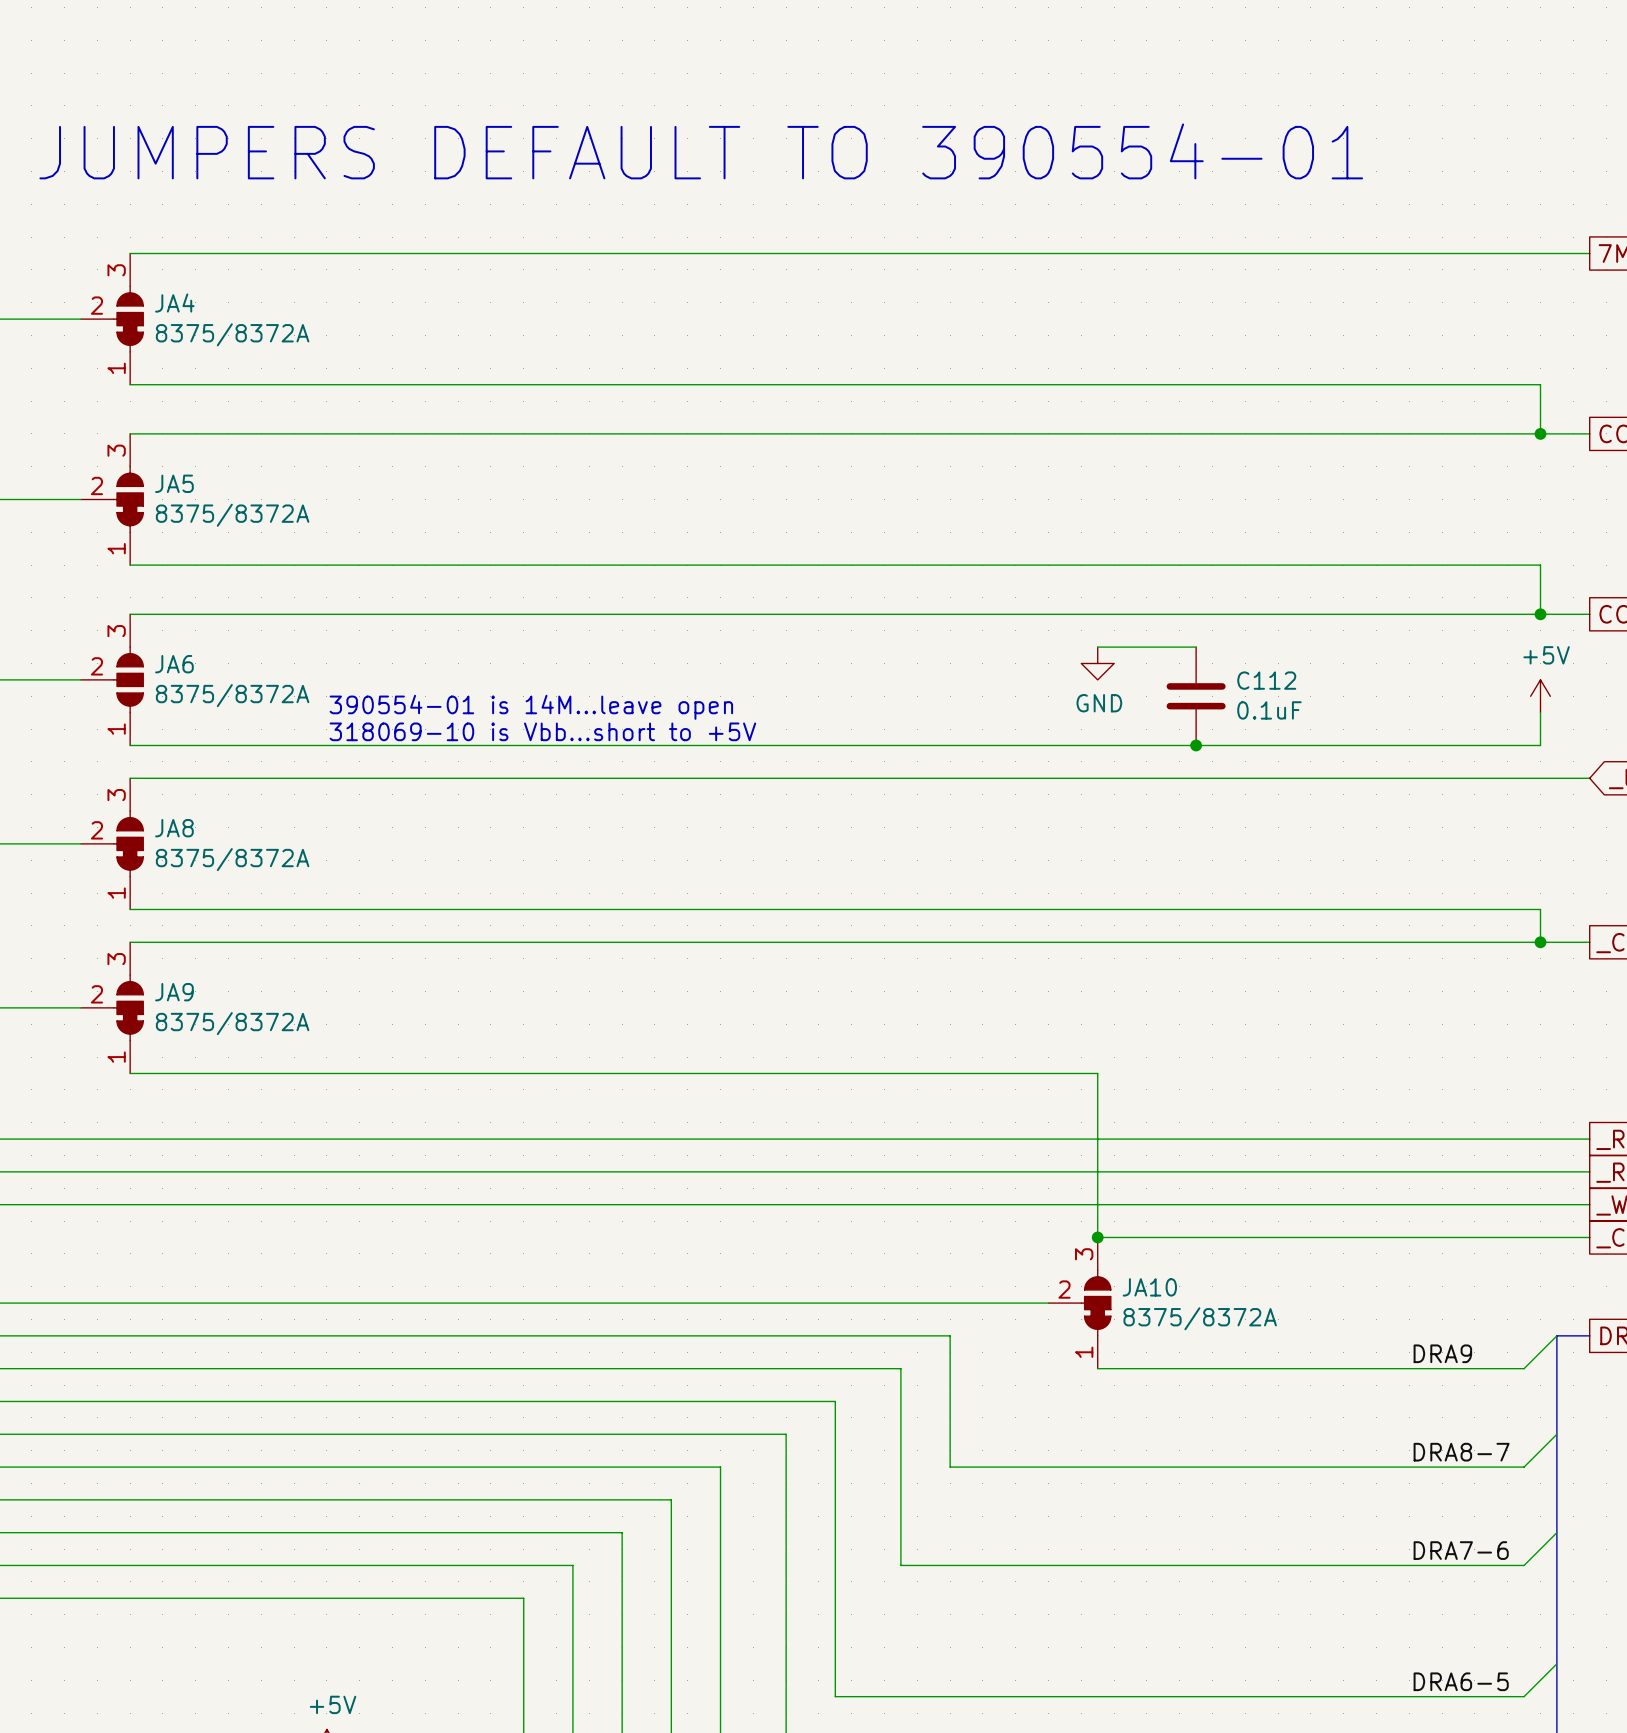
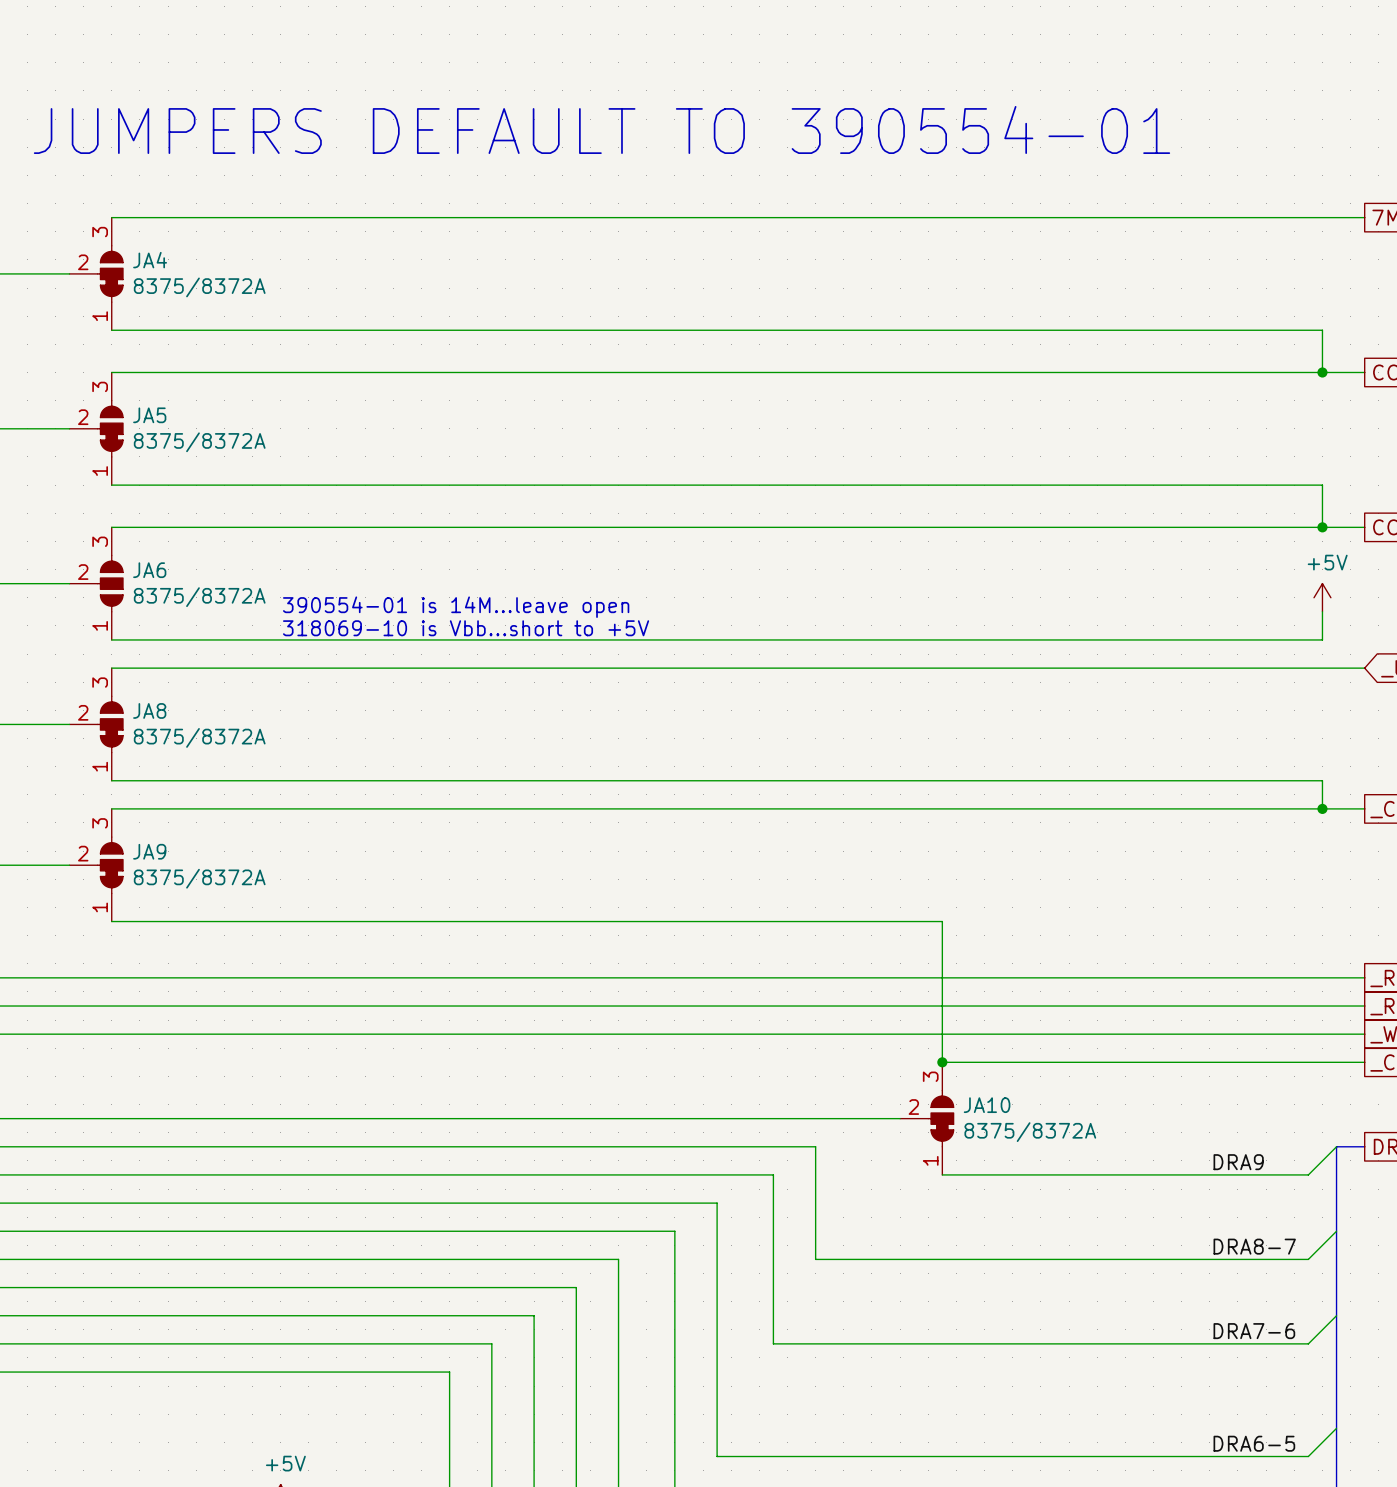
wire: (1097, 647) (1196, 647) -> none
power symbol: GND (1097, 663) -> none
C112: 0.1uF (1196, 696) -> none
junction: (1196, 745) -> none

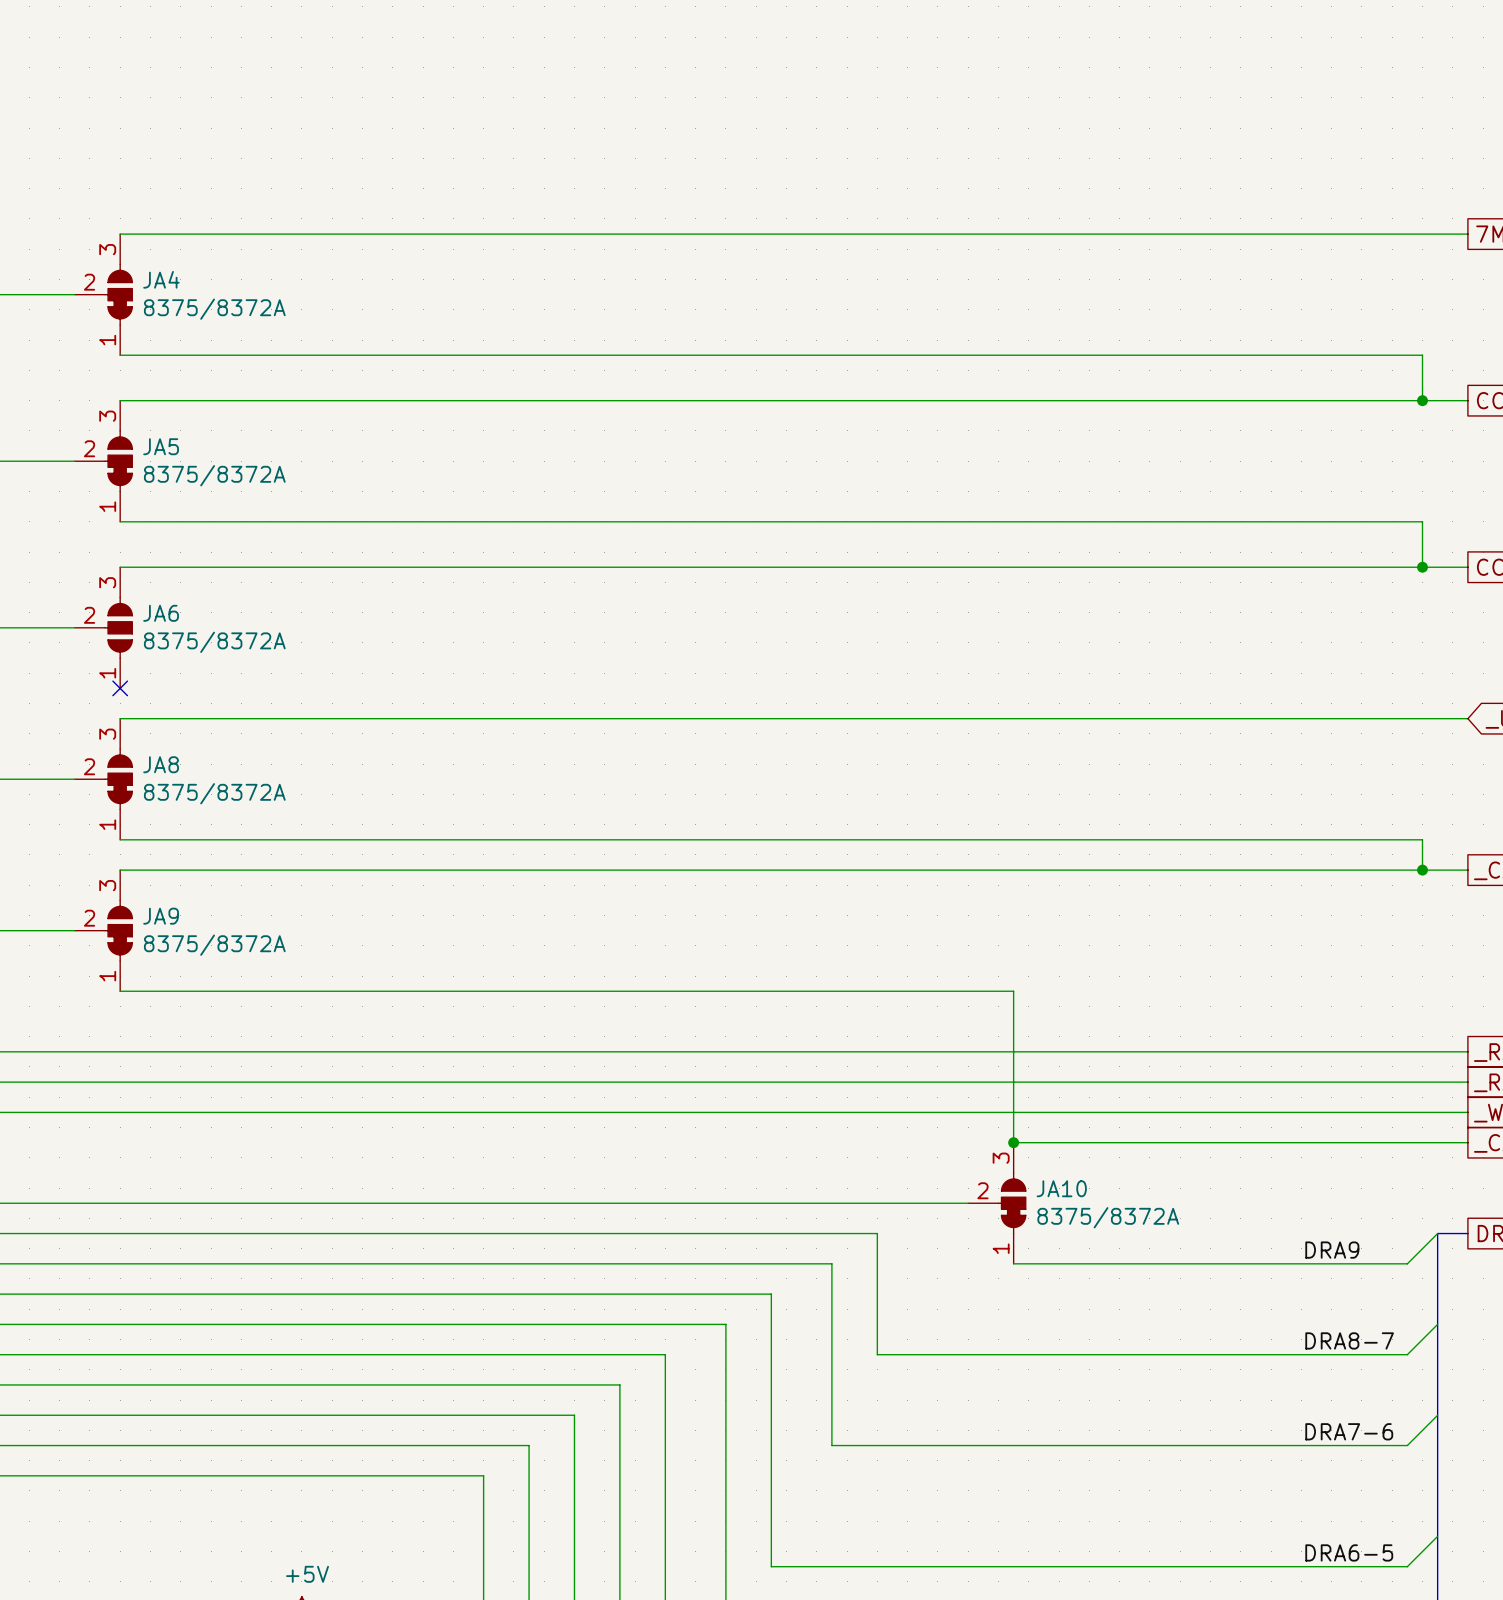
text: JUMPERS DEFAULT TO 390554-01 (601, 129) -> none
power symbol: +5V (1322, 597) -> none
text: 390554-01 is 14M...leave open (456, 607) -> none
wire: (1322, 611) (1322, 639) (111, 639) -> none
text: 318069-10 is Vbb...short to +5V (466, 628) -> none
no-connect mark: none -> (120, 688)

